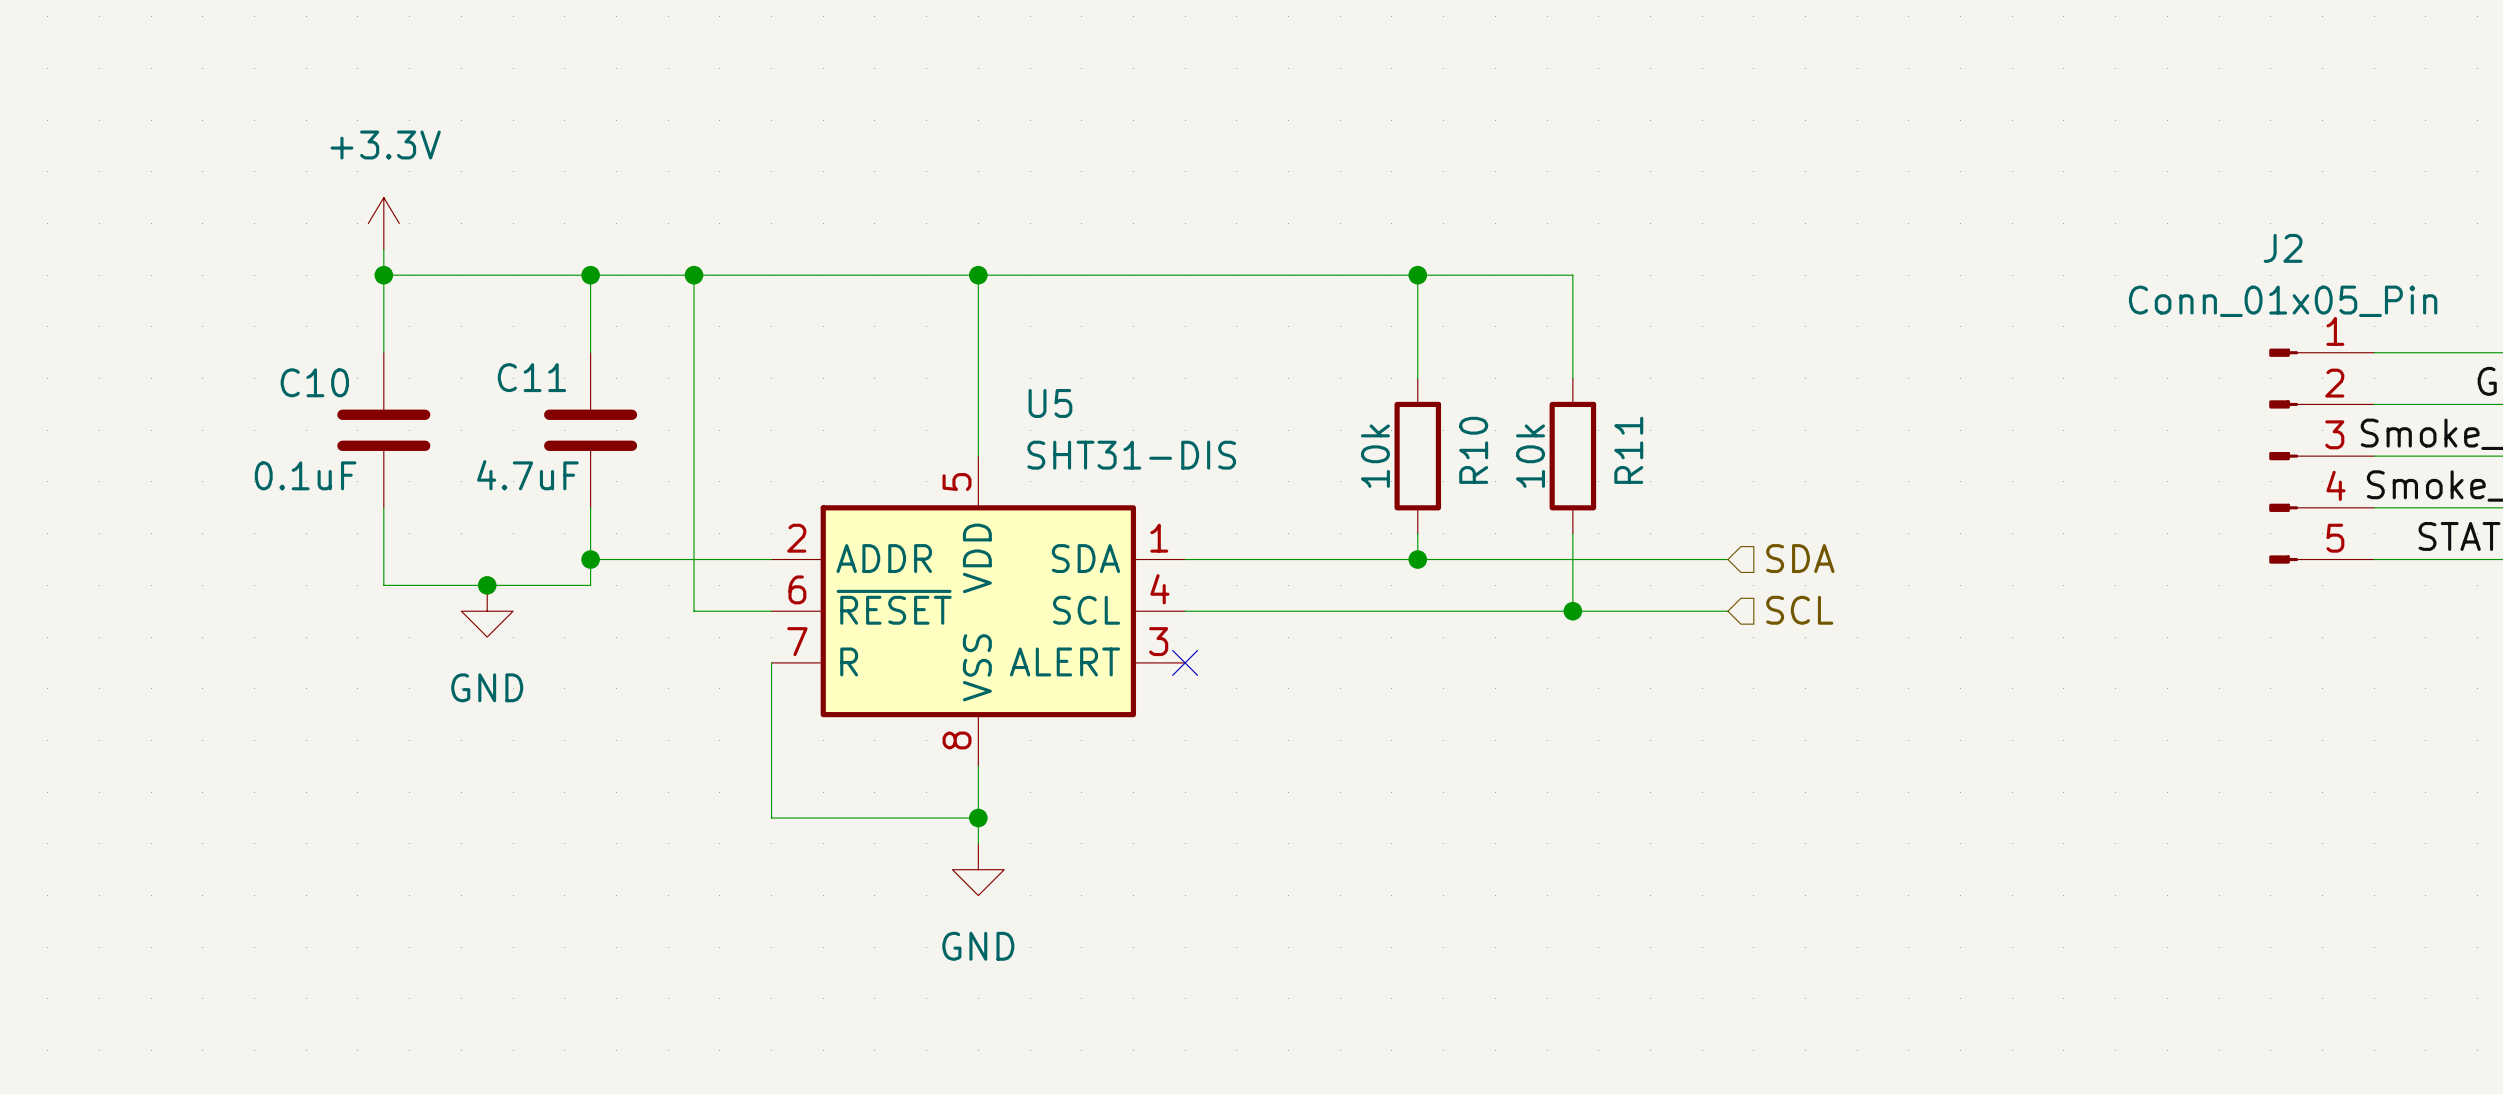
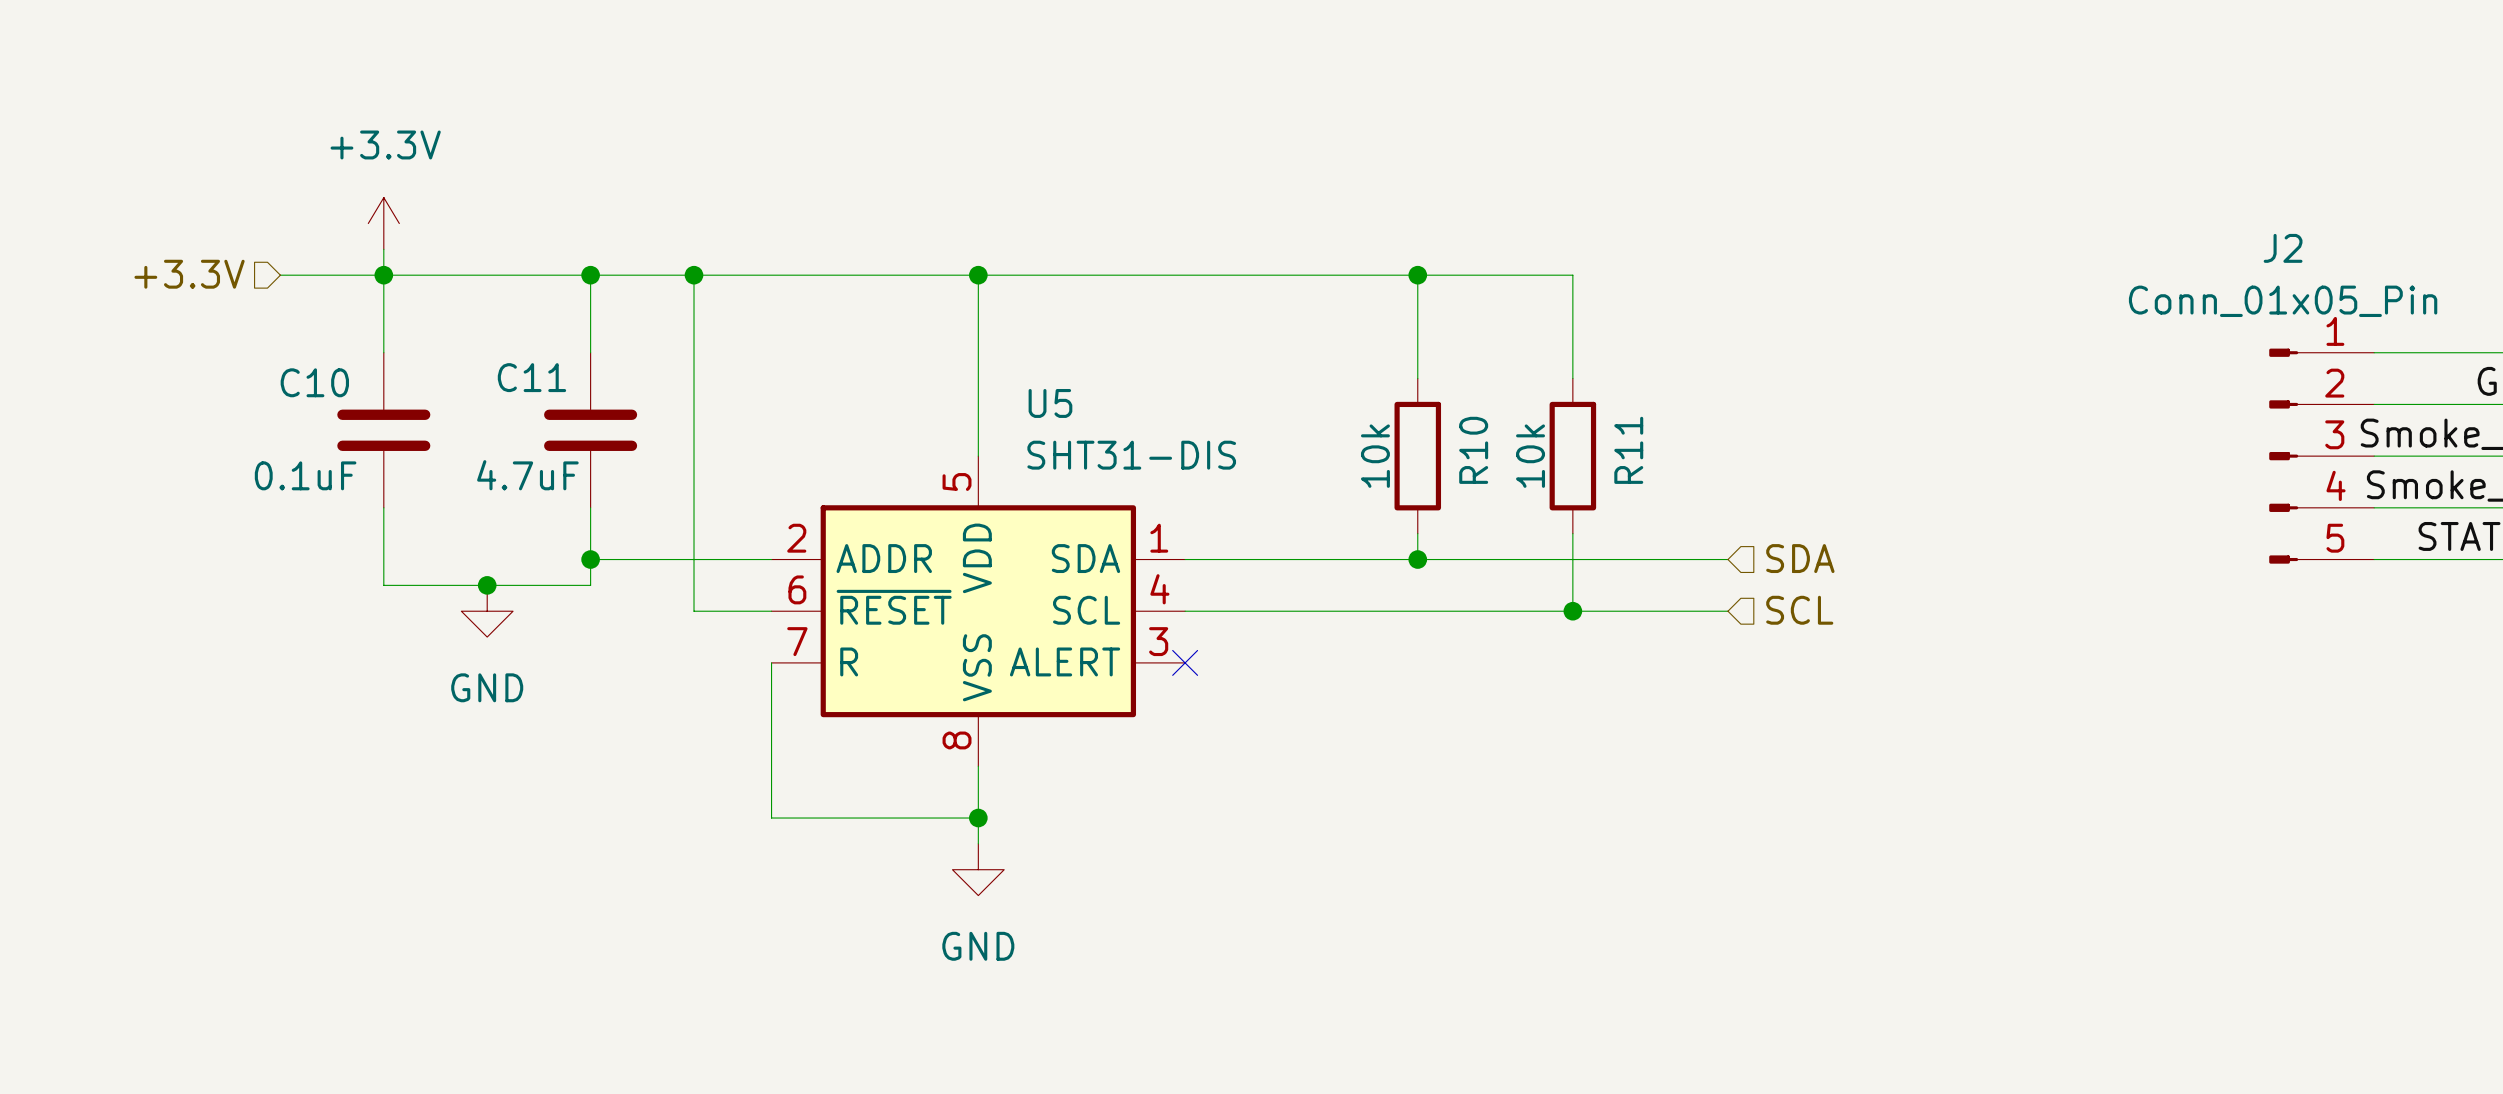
hierarchical label: none -> +3.3V (189, 274)
wire: none -> (280, 275) (383, 275)

